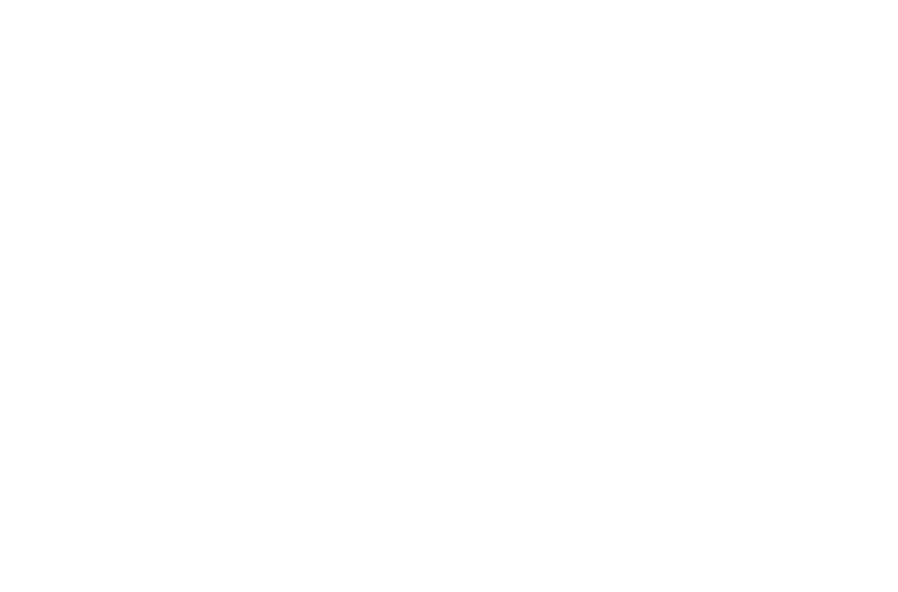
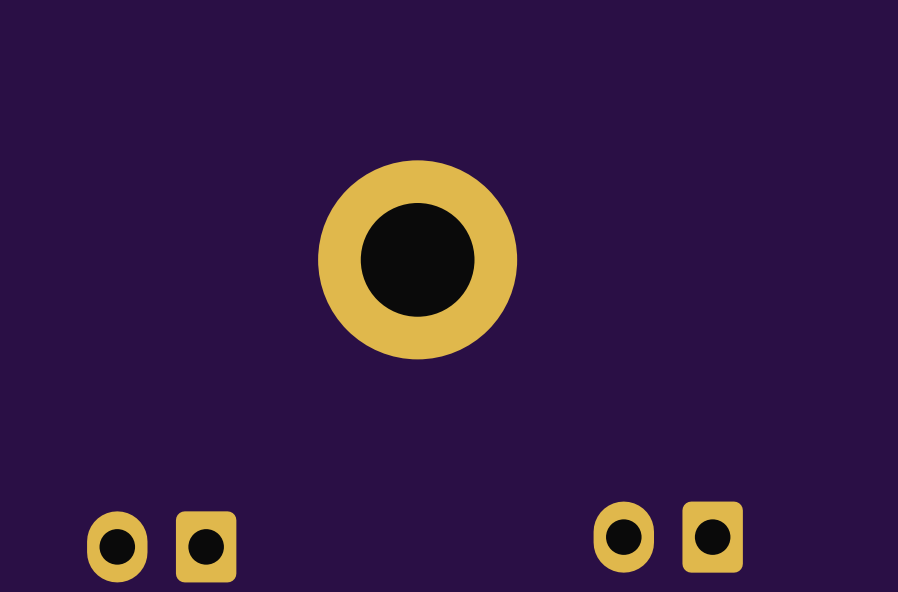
part: none -> (417, 259)
part: none -> (668, 537)
part: none -> (161, 546)

